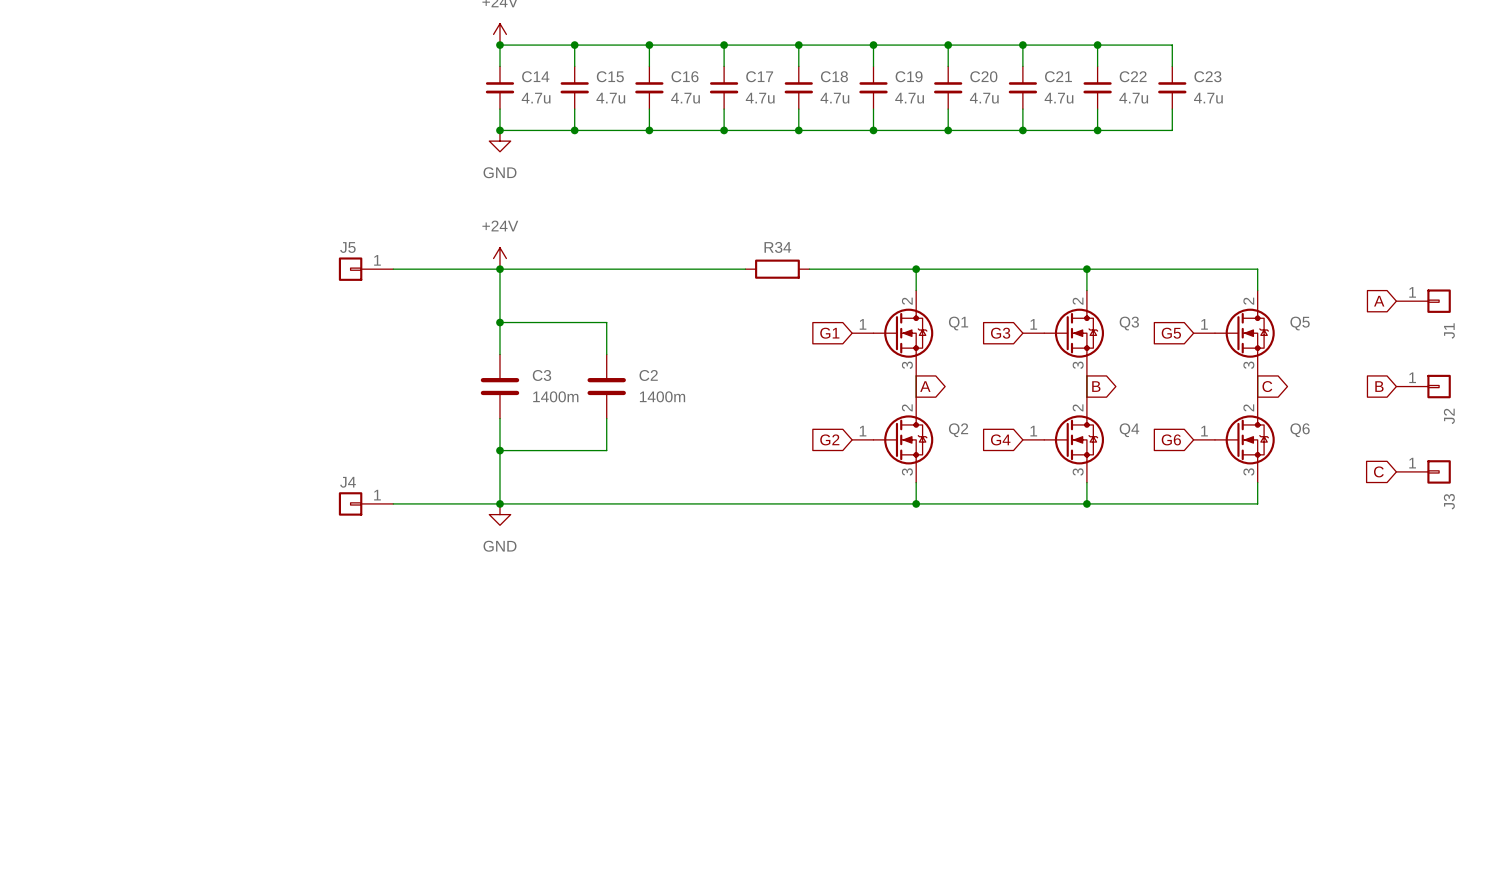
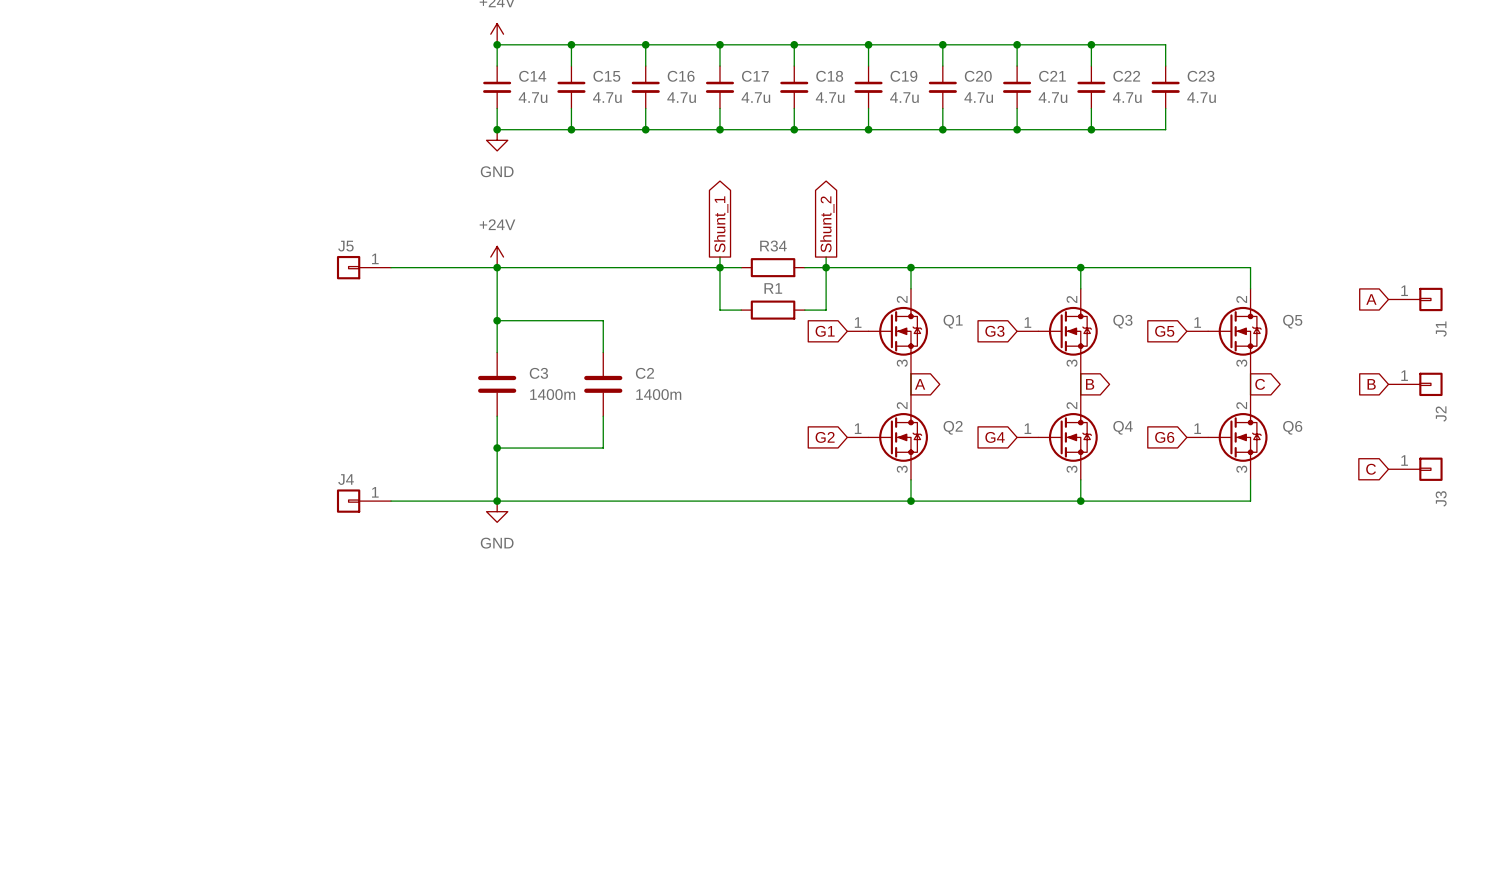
global label: none -> Shunt_1 (721, 224)
global label: none -> Shunt_2 (827, 224)
wire: none -> (719, 257) (719, 310) (741, 310)
wire: none -> (826, 257) (826, 310) (804, 310)
junction: none -> (719, 267)
junction: none -> (826, 267)
R1: none -> (773, 310)

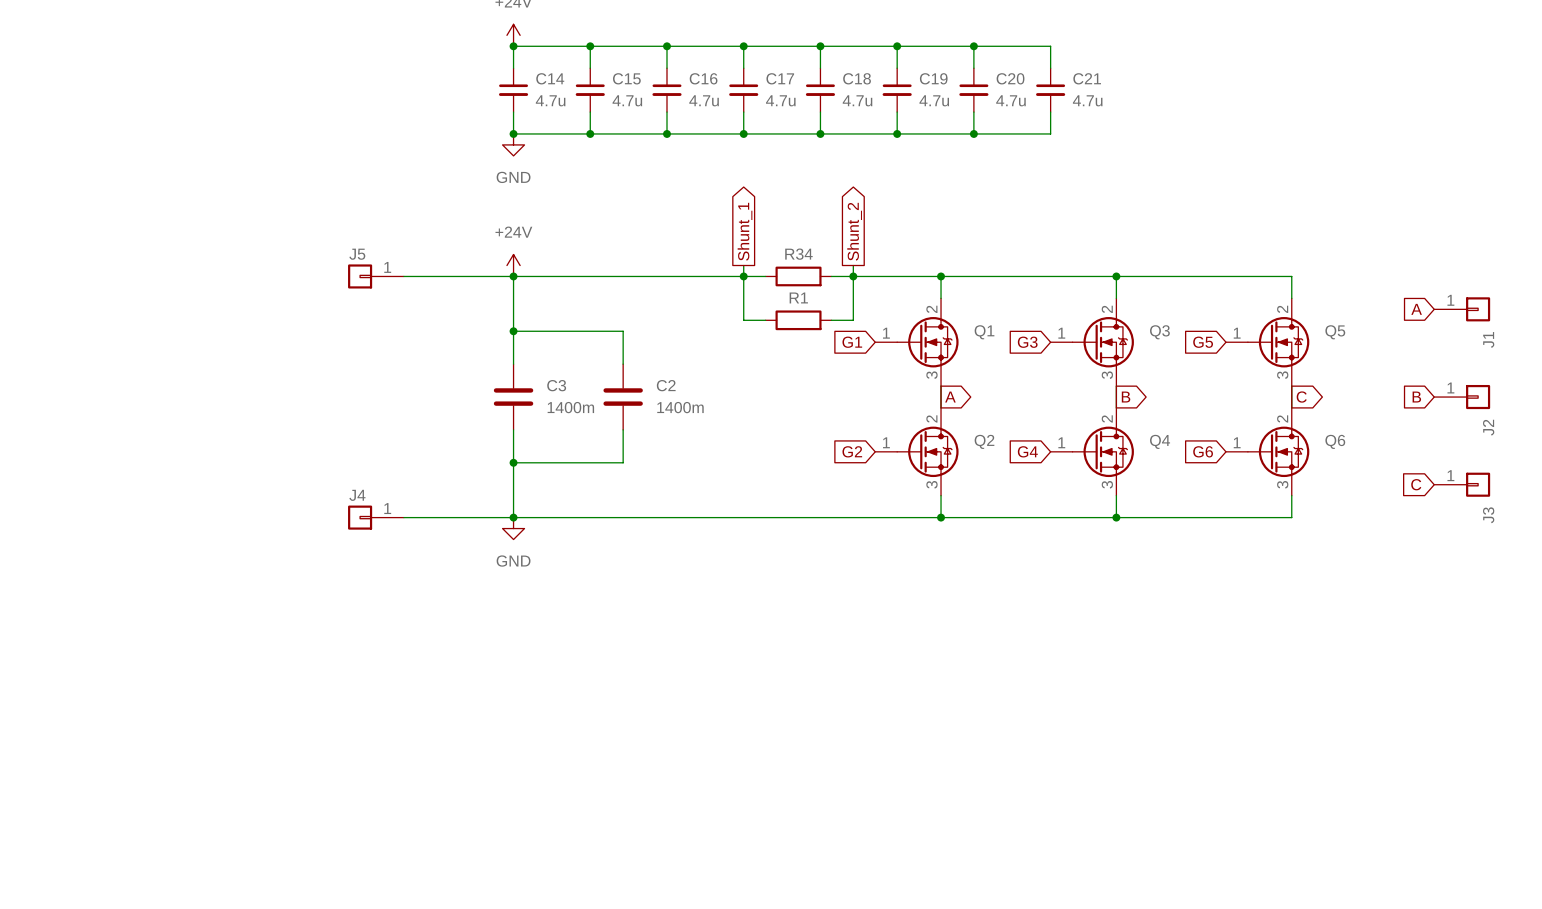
wire: (1017, 44) (1165, 44) (1165, 66) -> none
junction: (1017, 44) -> none
wire: (1091, 44) (1091, 66) -> none
junction: (1091, 44) -> none
C22: 4.7u (1091, 87) -> none
C23: 4.7u (1165, 87) -> none
wire: (1091, 108) (1091, 129) -> none
wire: (1165, 108) (1165, 129) (1017, 129) -> none
junction: (1017, 129) -> none
junction: (1091, 129) -> none

